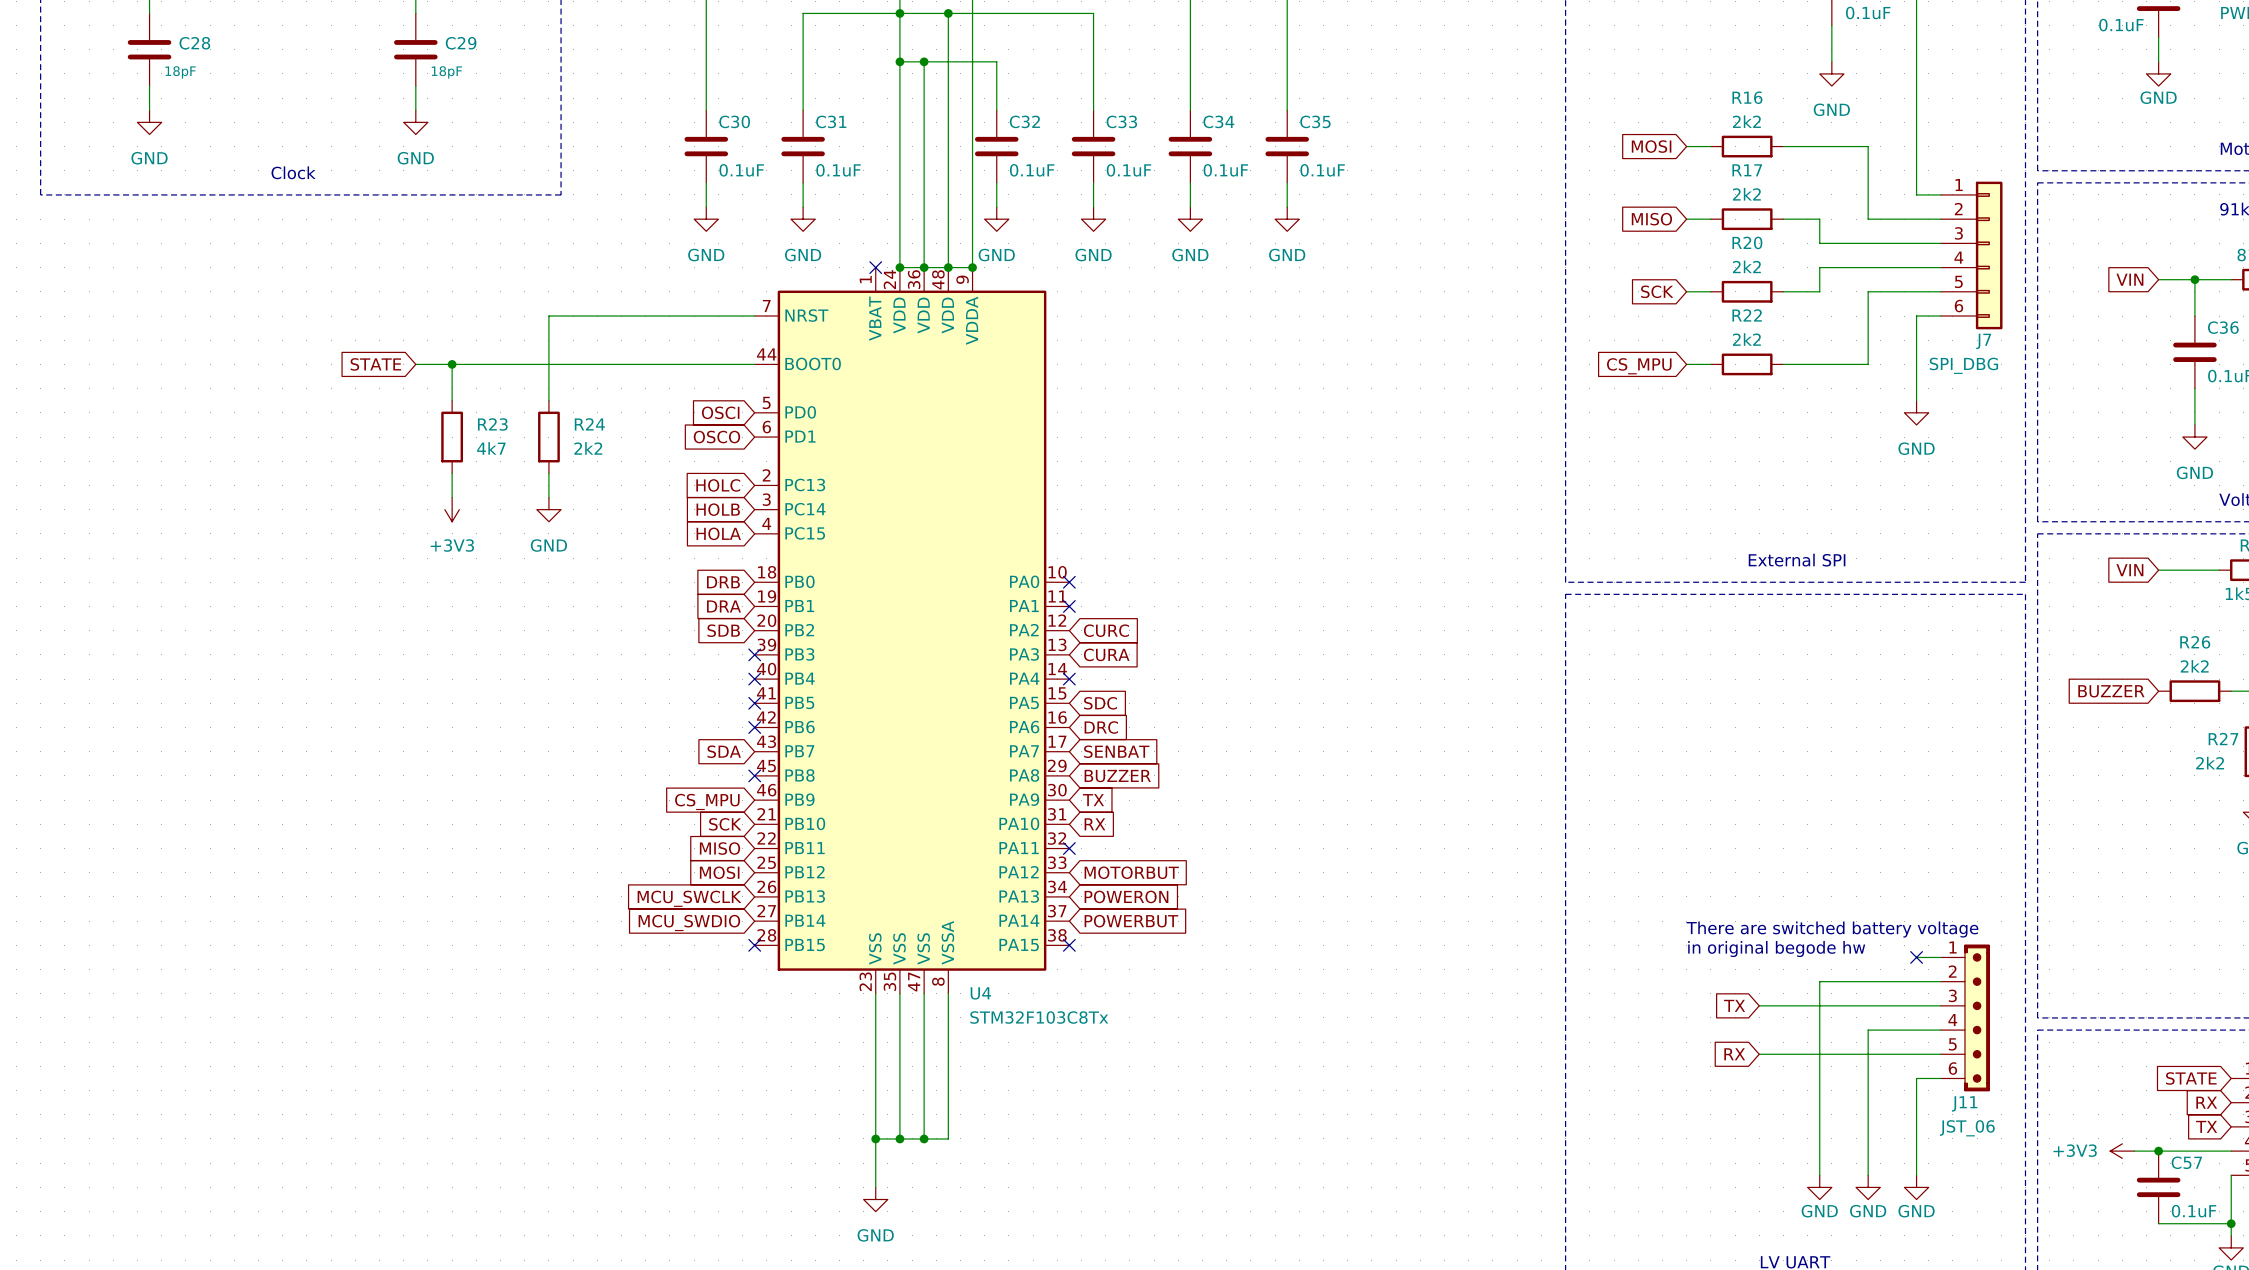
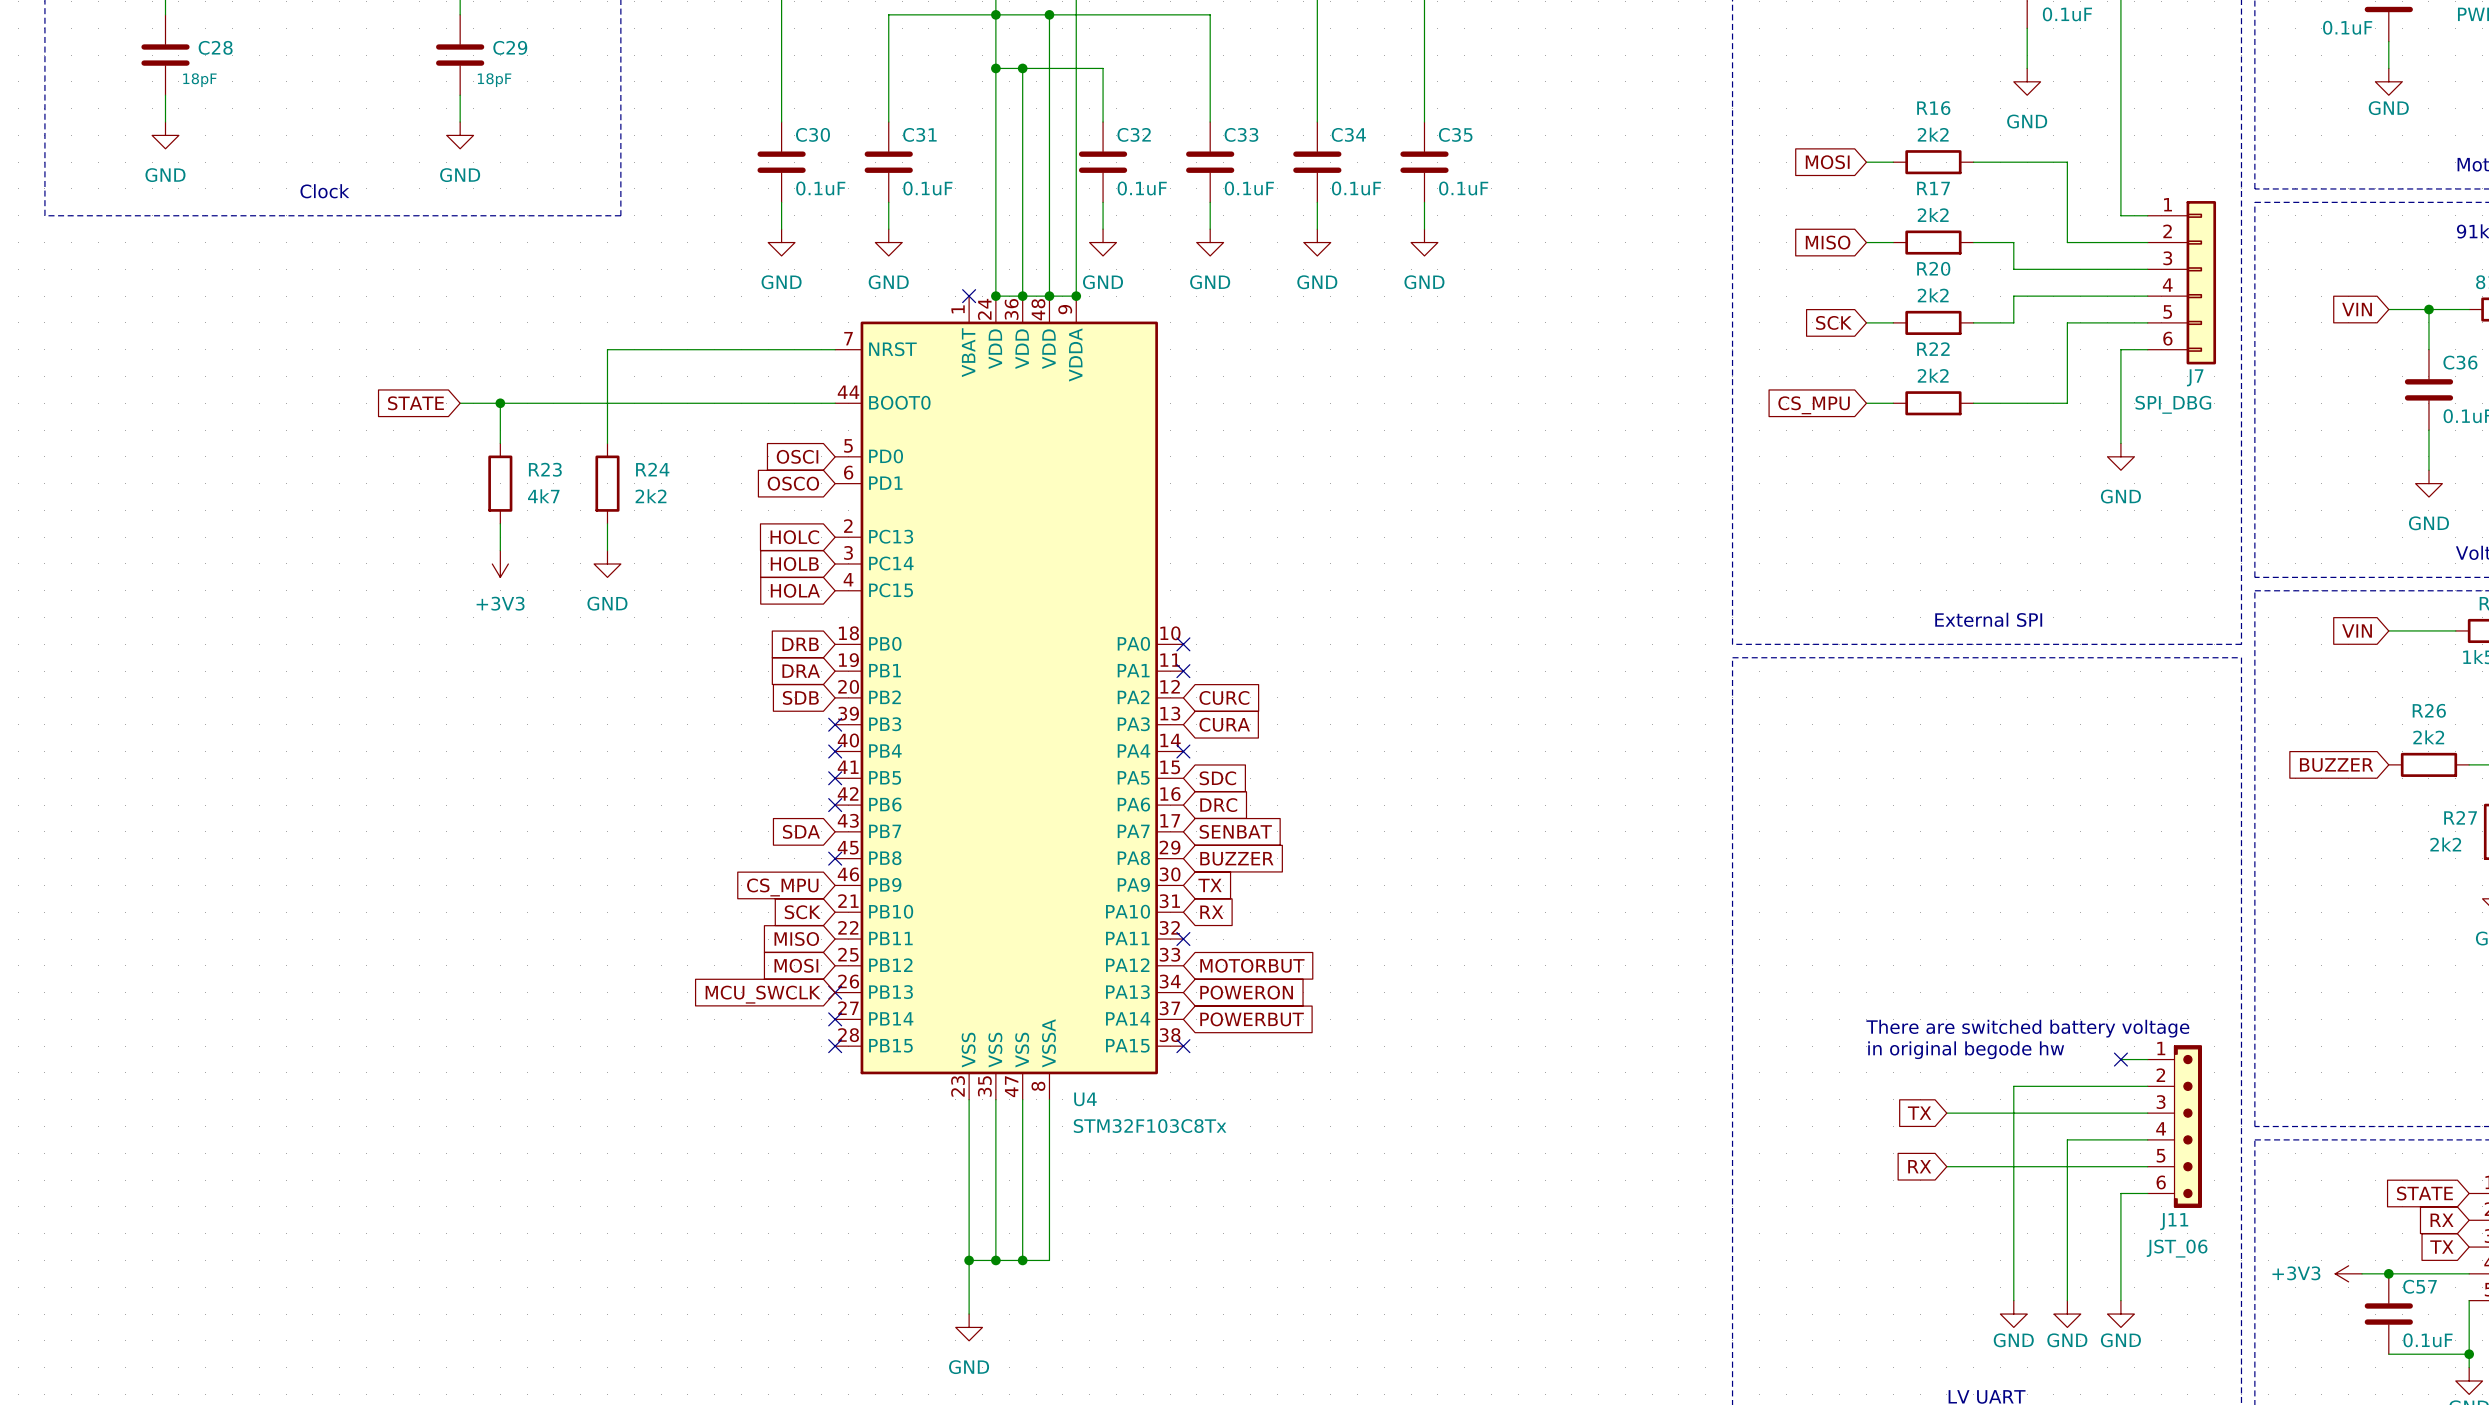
no-connect mark: none -> (835, 992)
no-connect mark: none -> (835, 1019)
global label: MCU_SWDIO (689, 922) -> none

